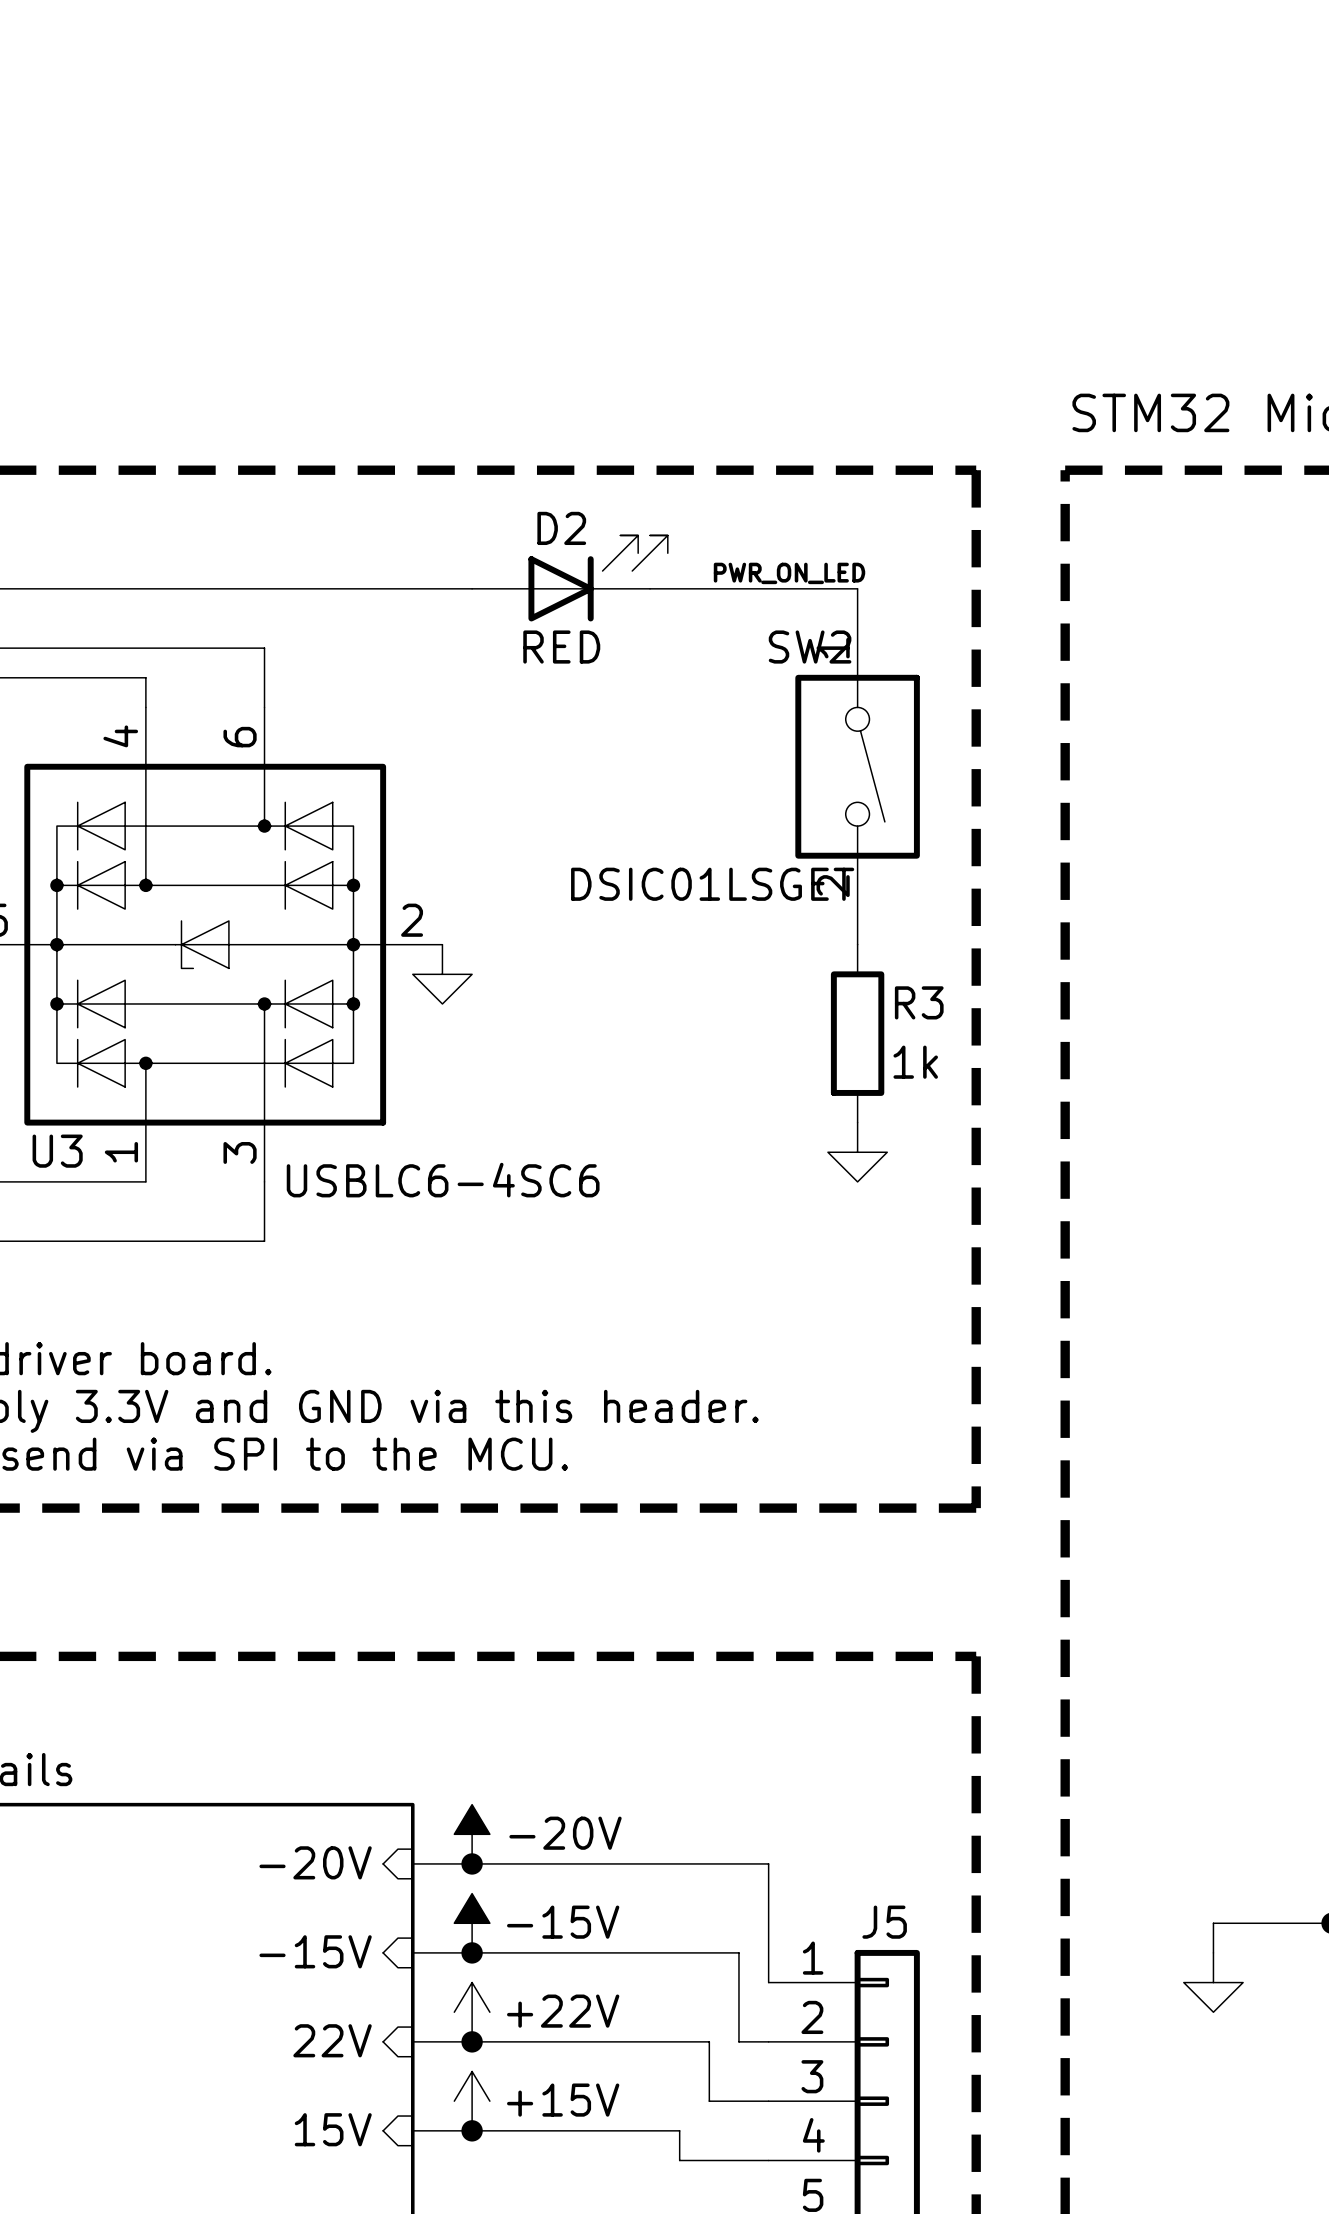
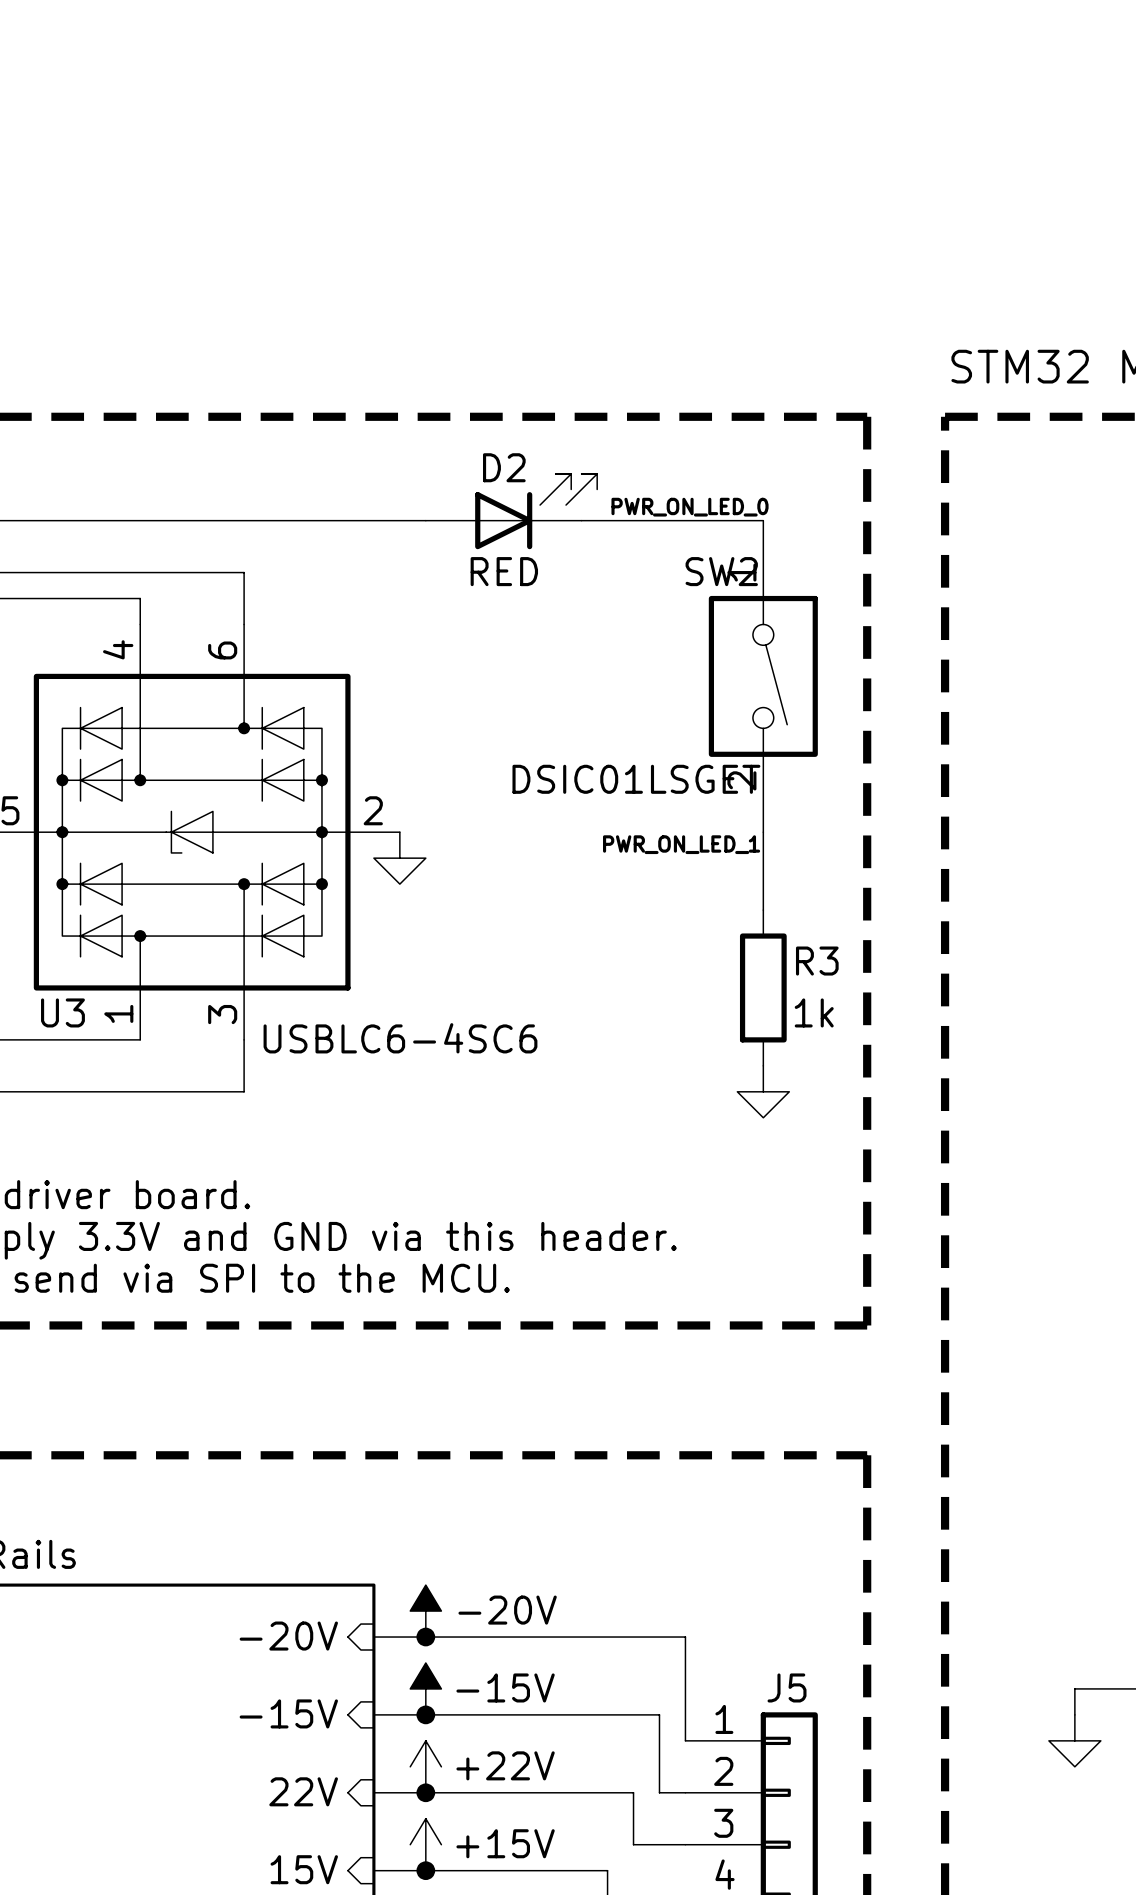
label: PWR_ON_LED (789, 573) -> PWR_ON_LED_0 (690, 507)
wire: none -> (763, 832) (763, 910)
label: none -> PWR_ON_LED_1 (681, 844)
R3 position: (857, 1033) -> (763, 987)
power symbol position: (857, 1152) -> (763, 1091)

